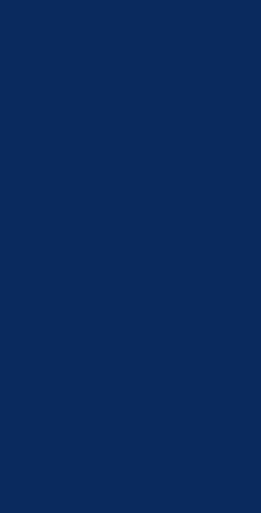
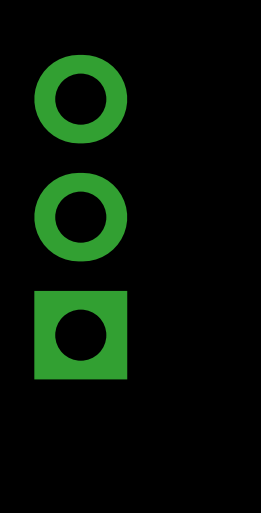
part: none -> (80, 217)

